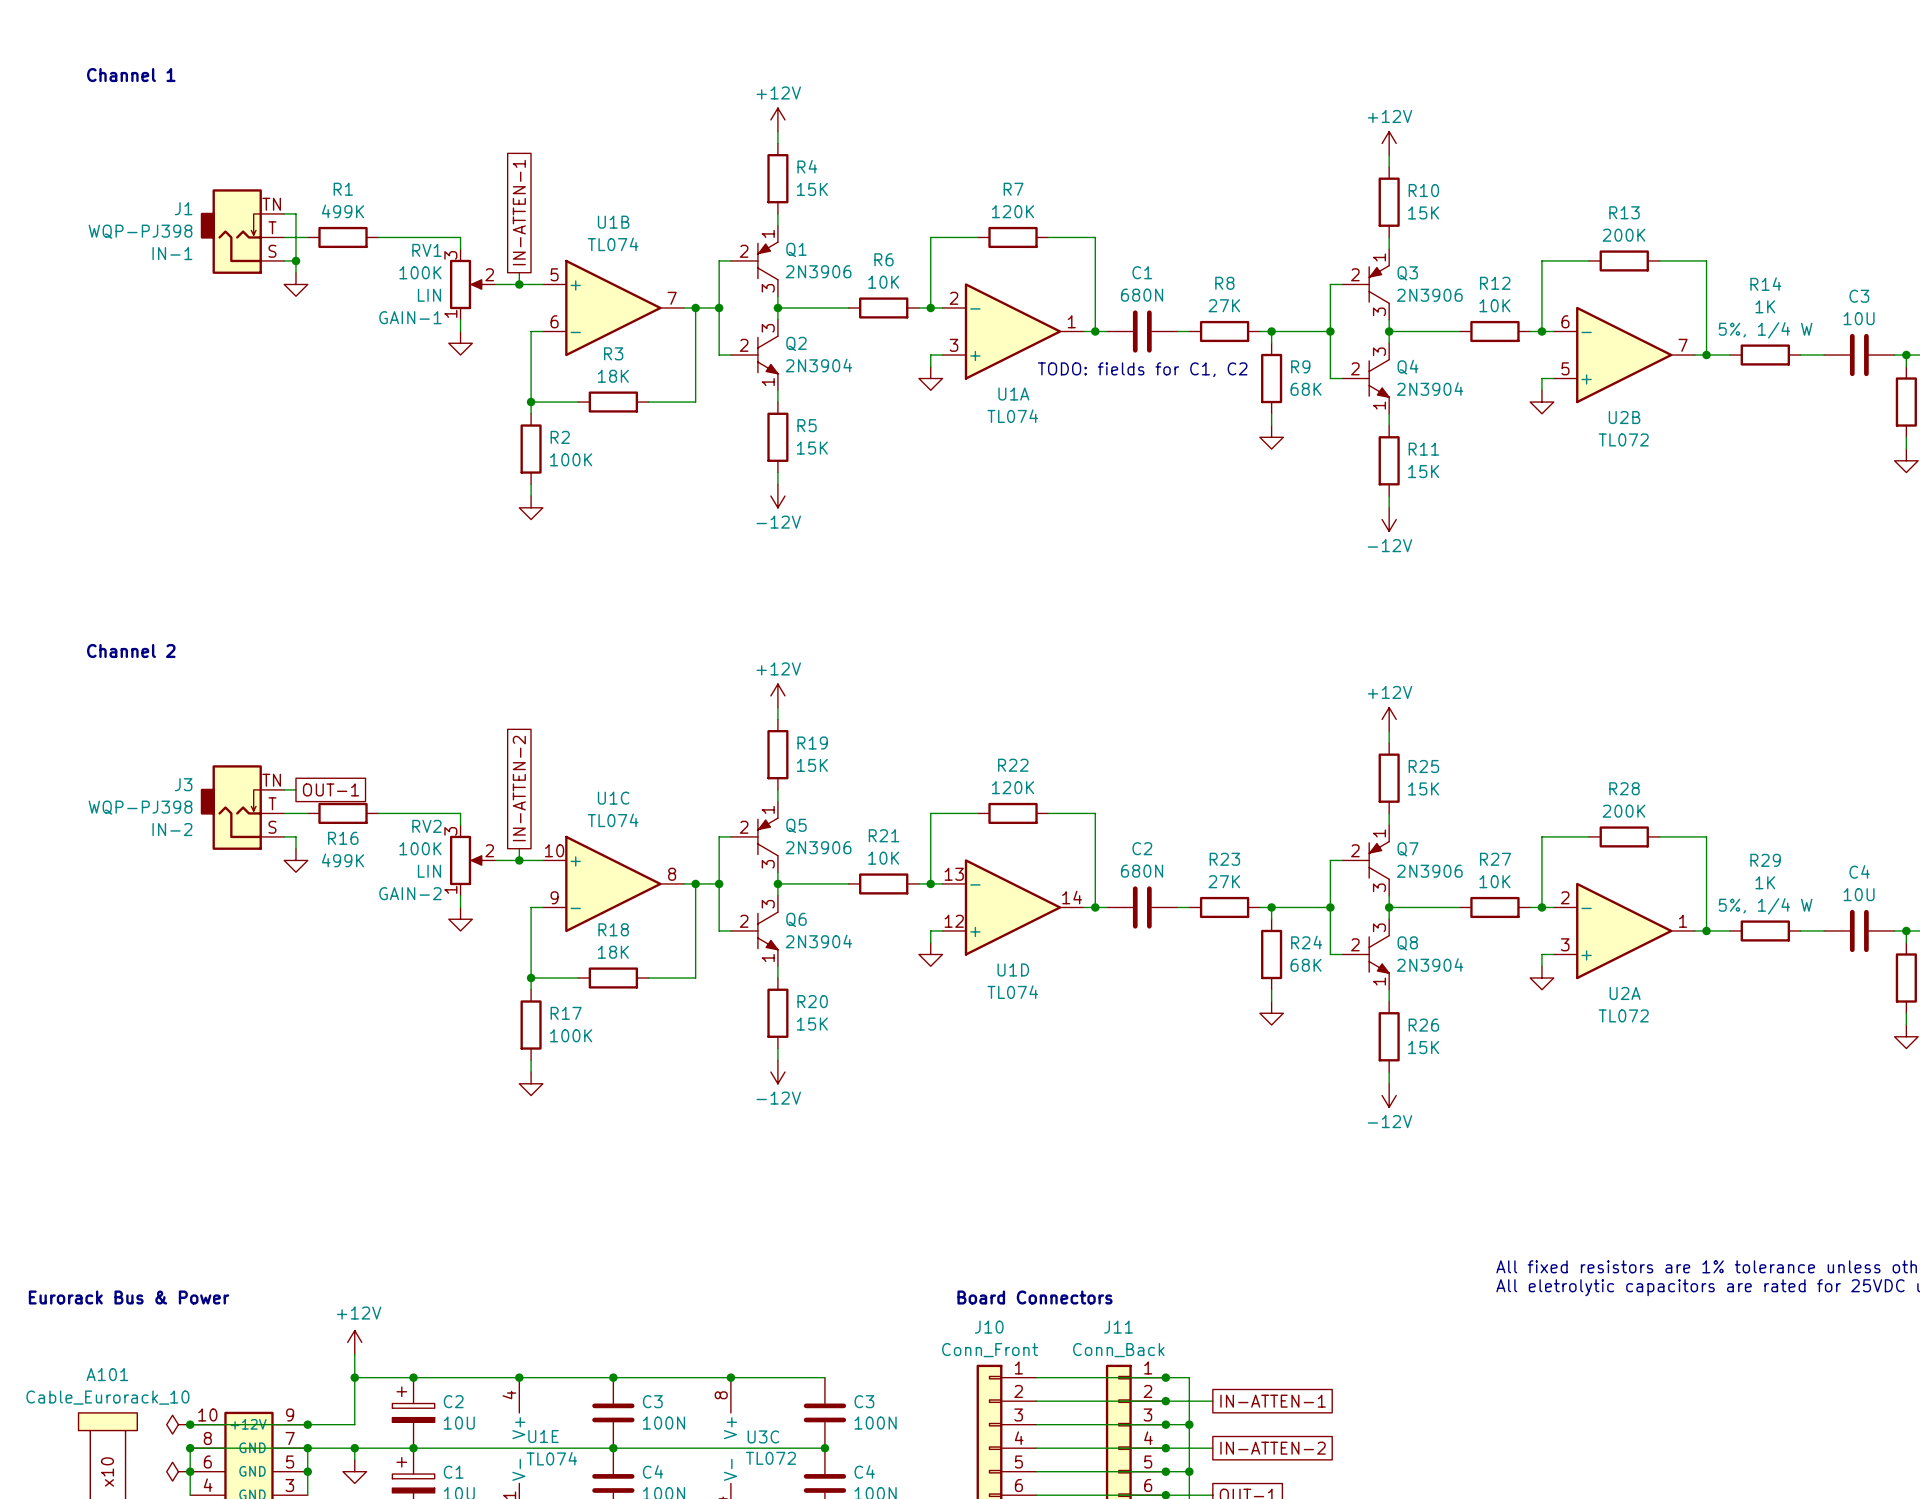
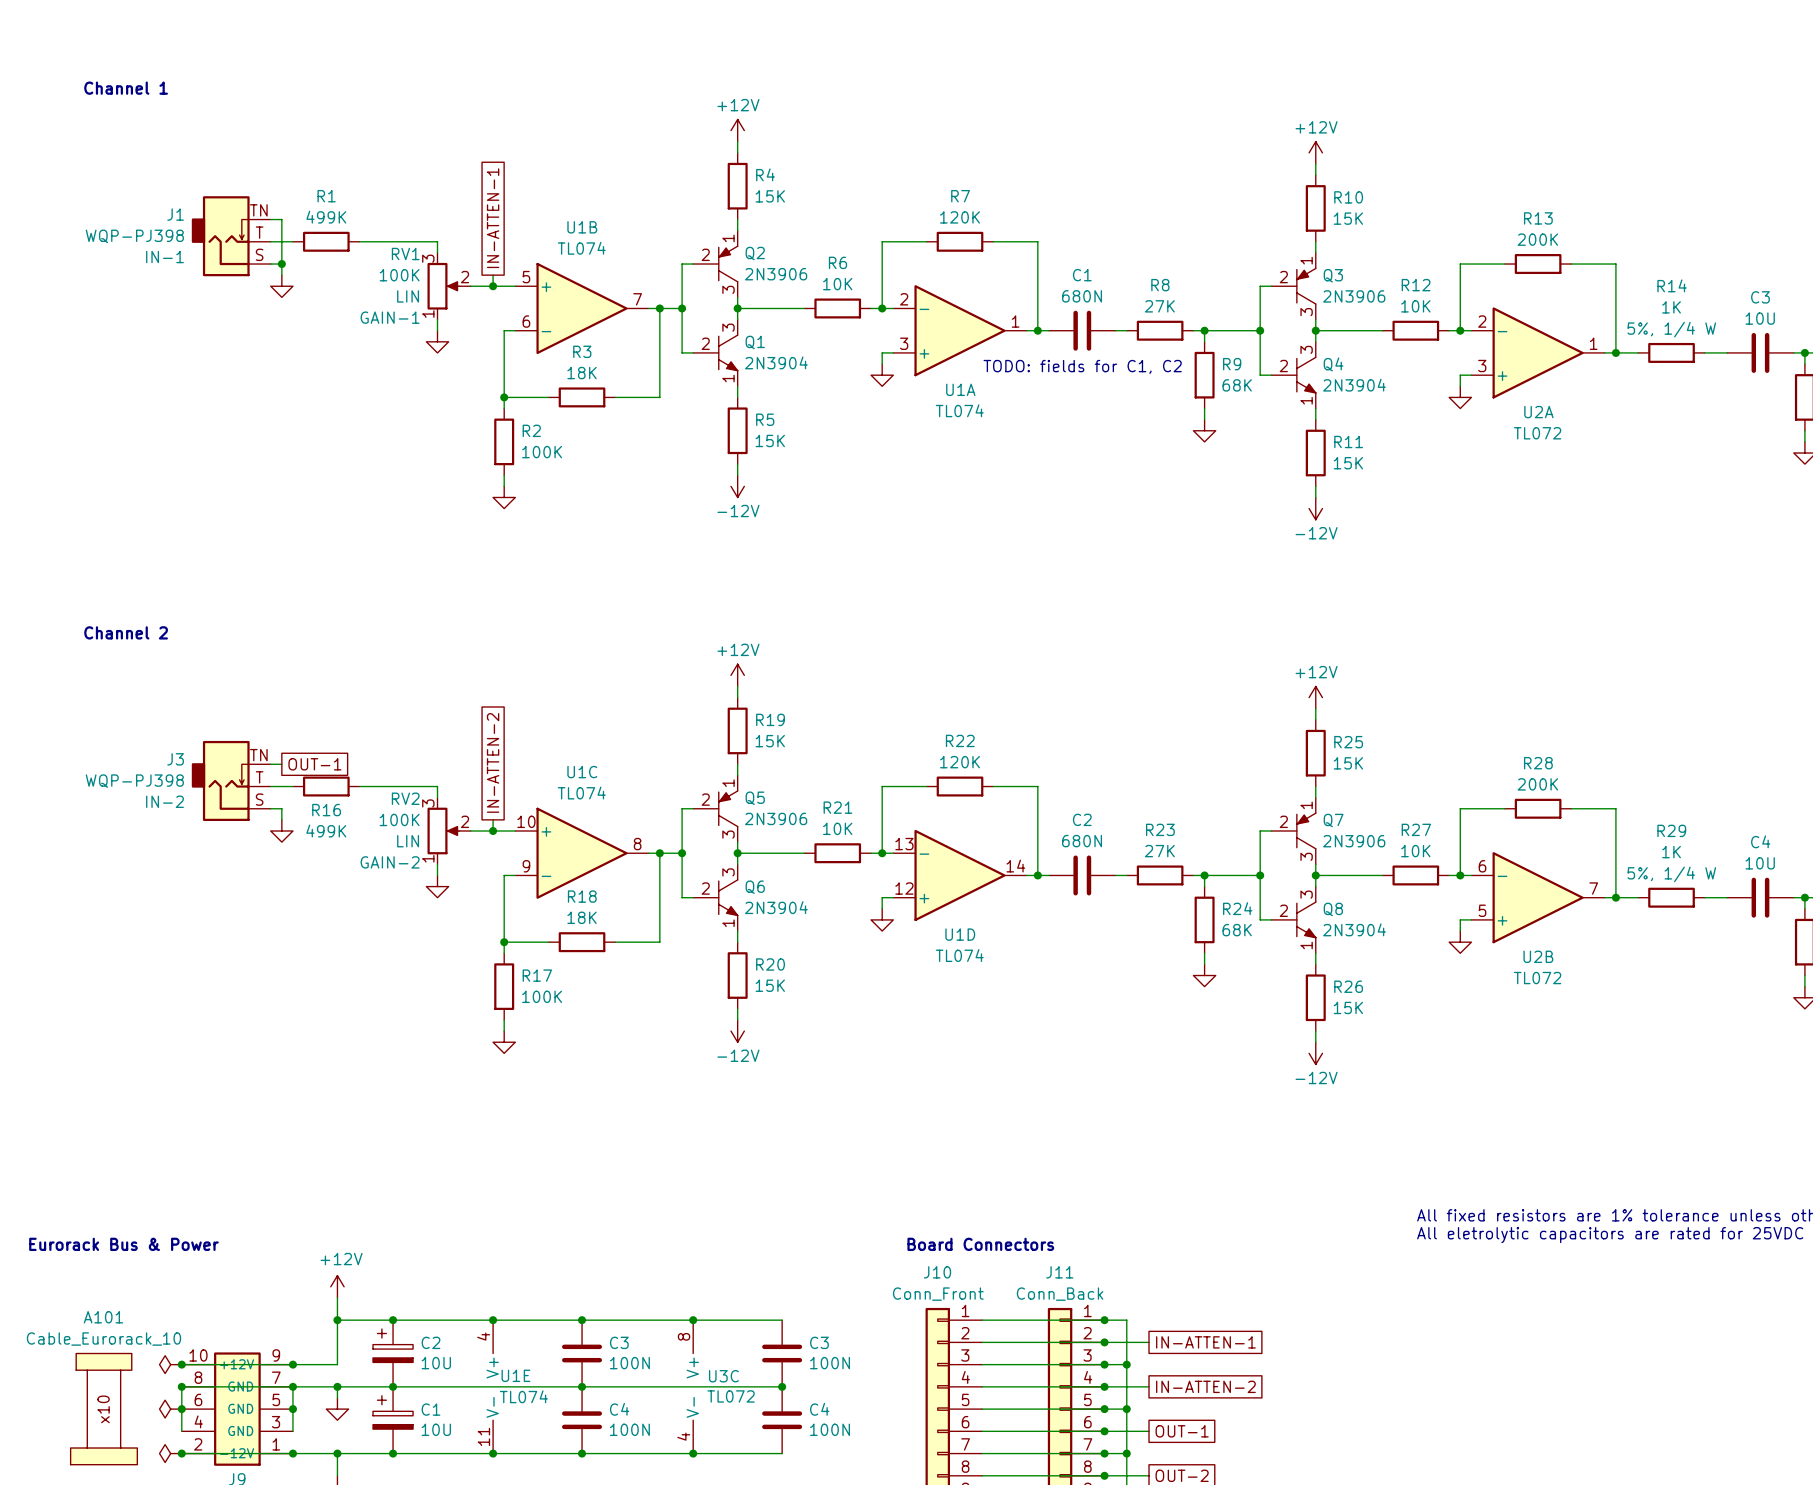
Q1 name: Q1 (796, 249) -> Q2 (755, 253)
Q2 name: Q2 (796, 343) -> Q1 (755, 342)
U2B position: (1624, 355) -> (1538, 897)
U2A position: (1624, 930) -> (1538, 352)

